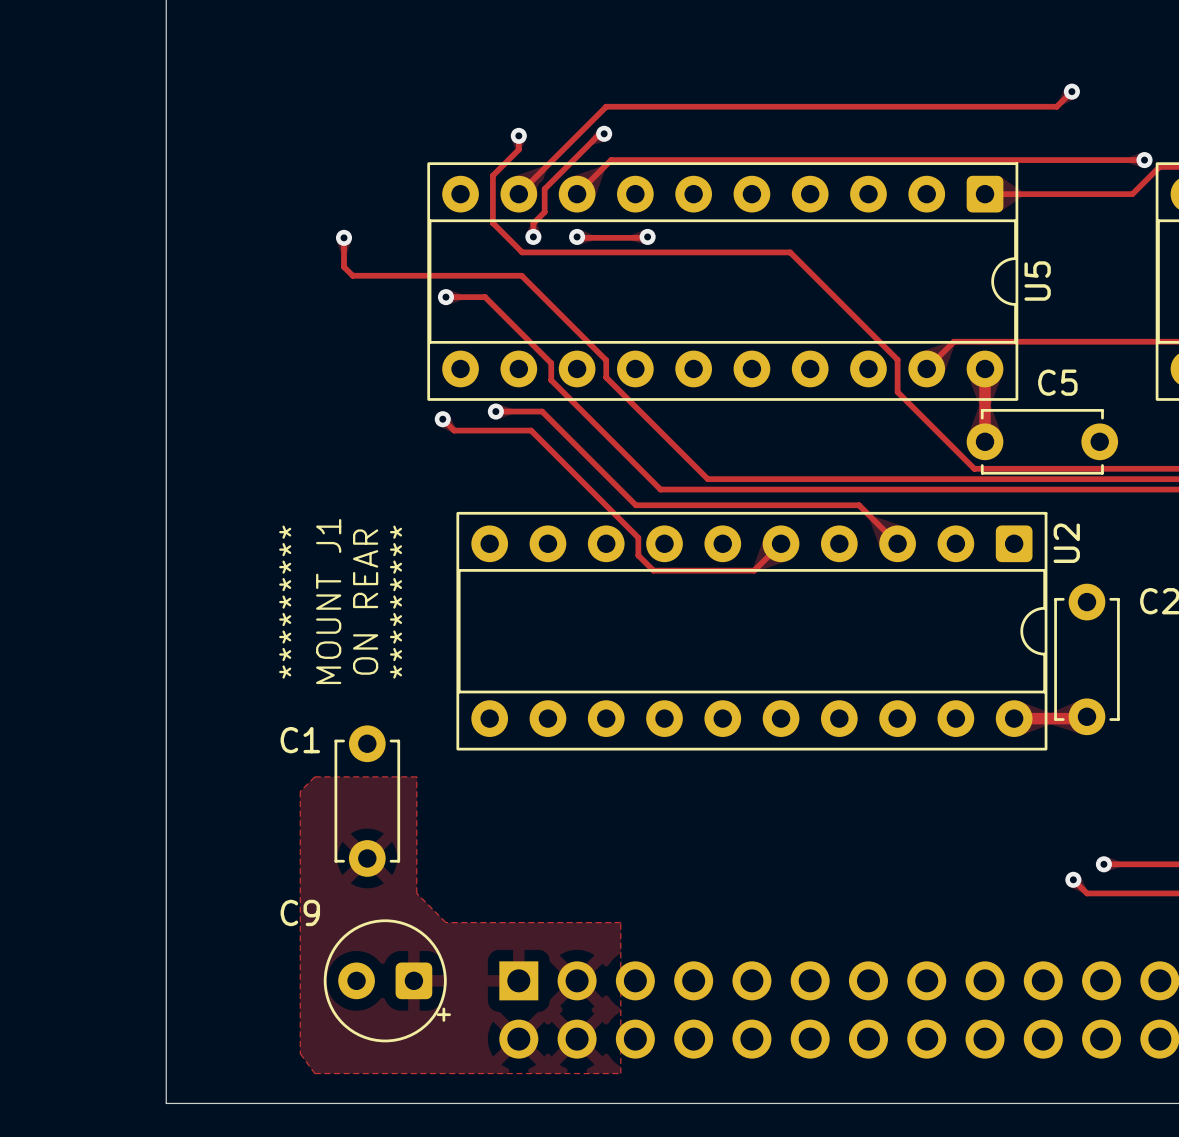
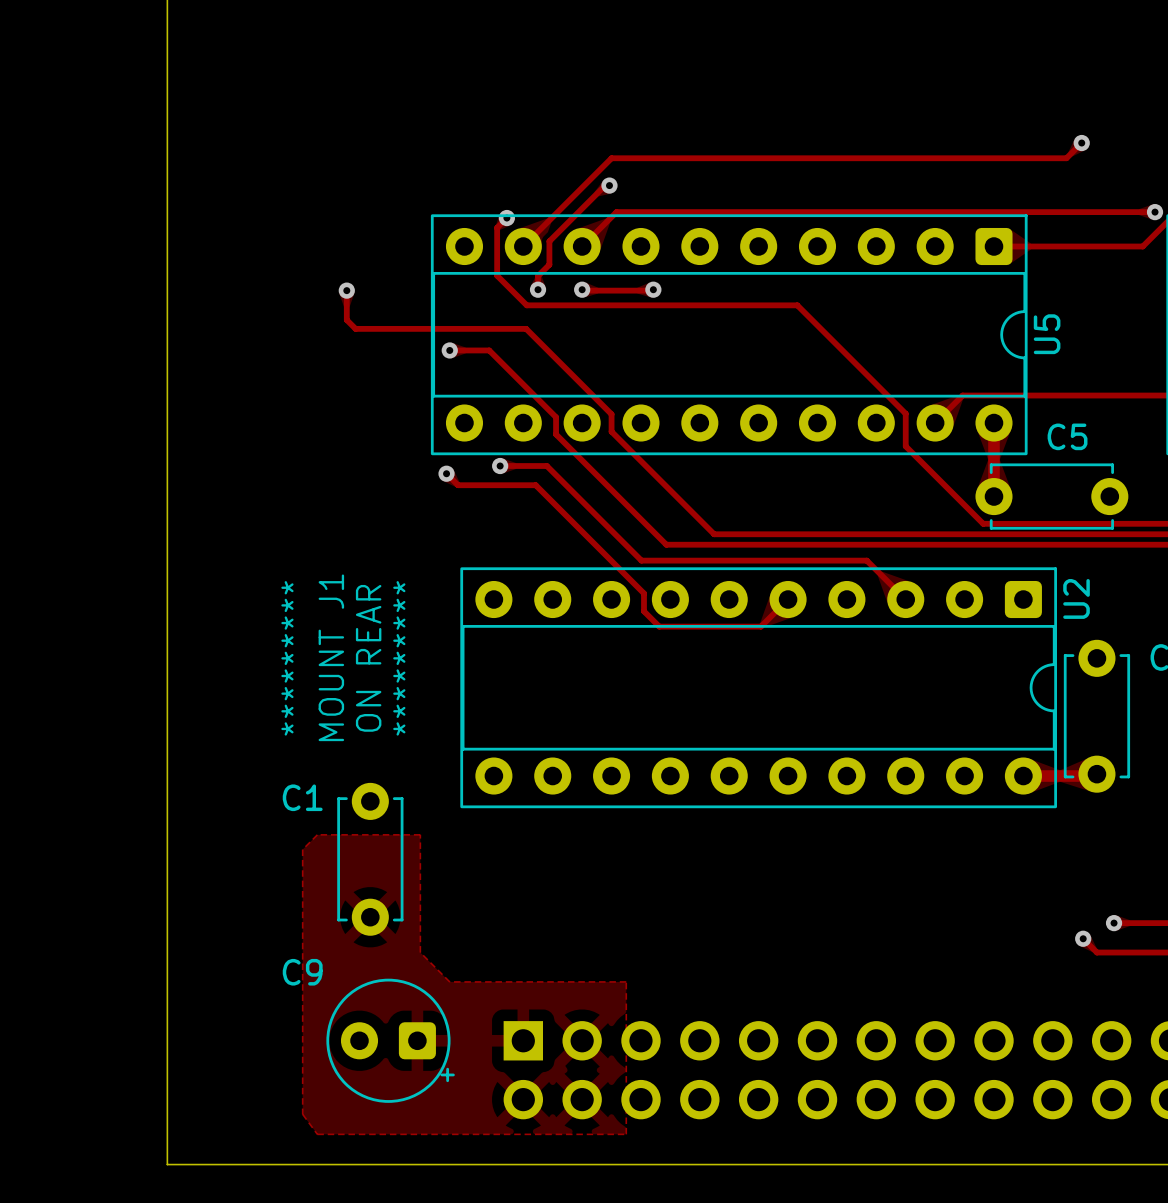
track: (518, 135) (518, 149) (502, 165) -> none
via position: (518, 135) -> (506, 218)

